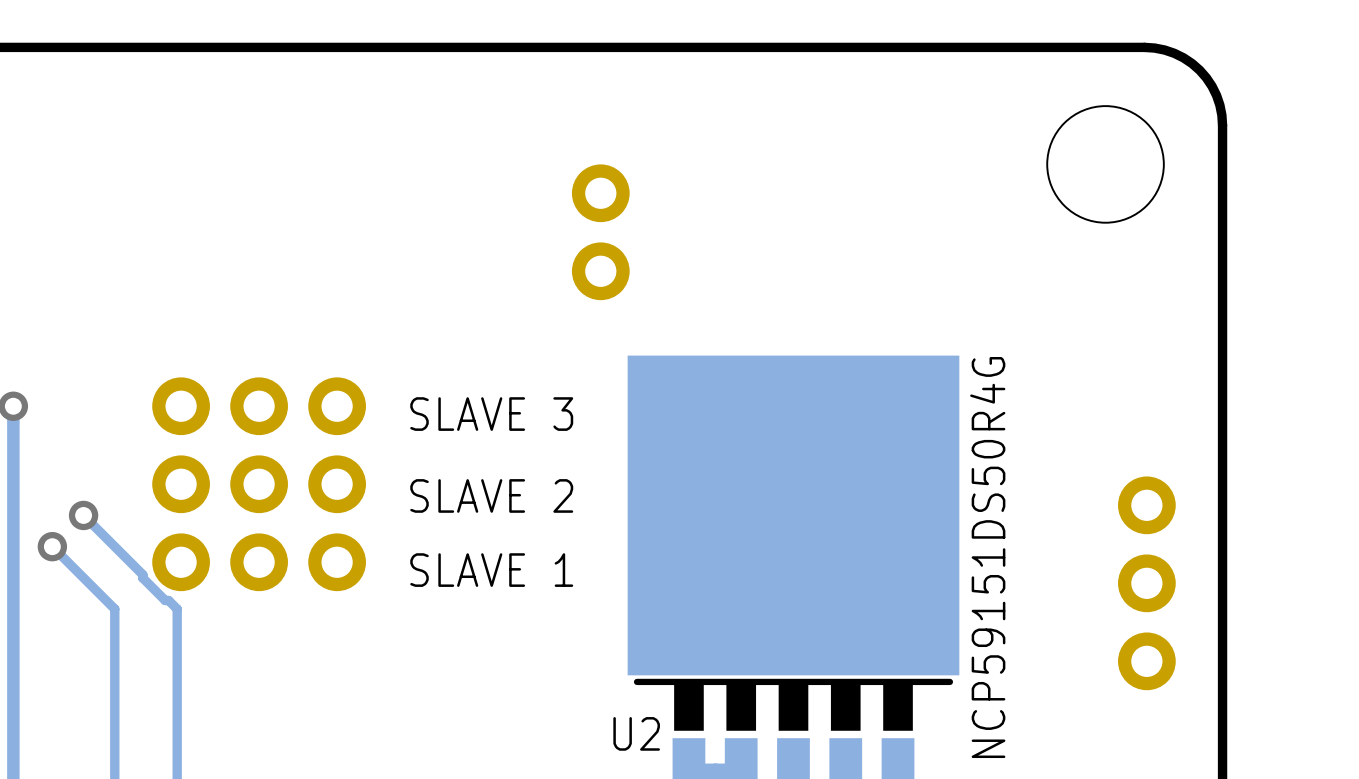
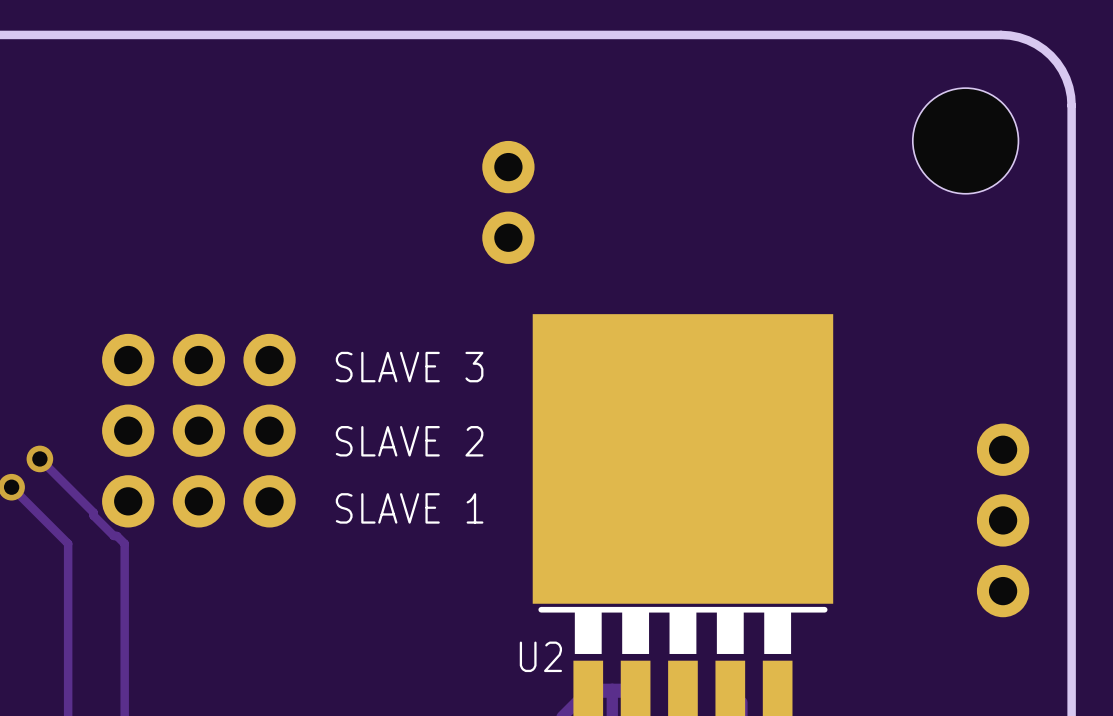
U2 value: NCP59151DS50R4G (987, 557) -> none

